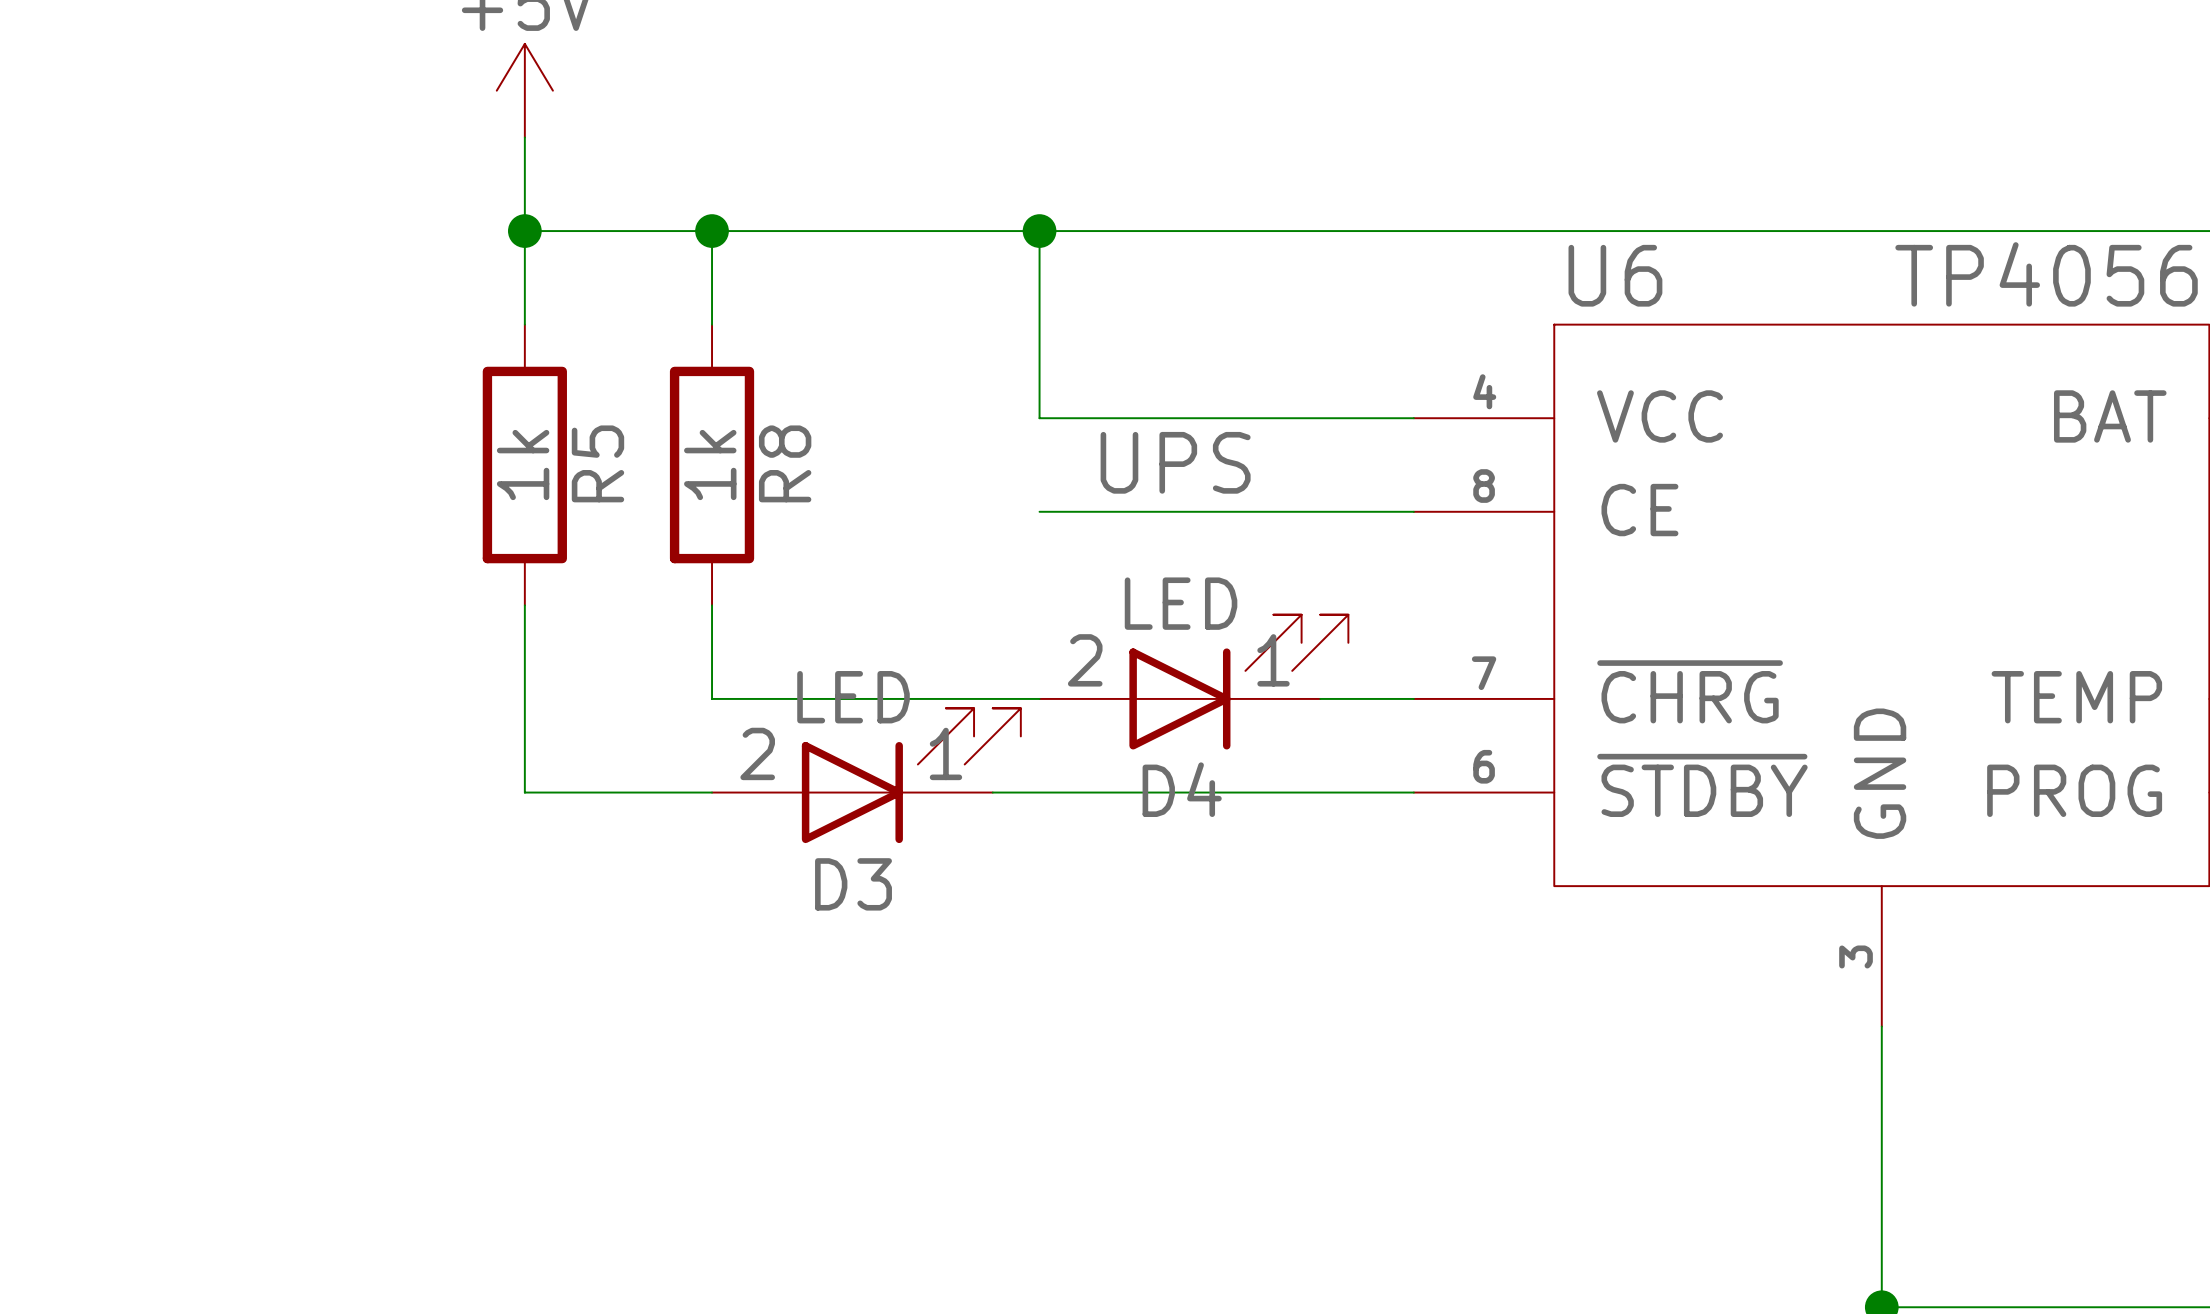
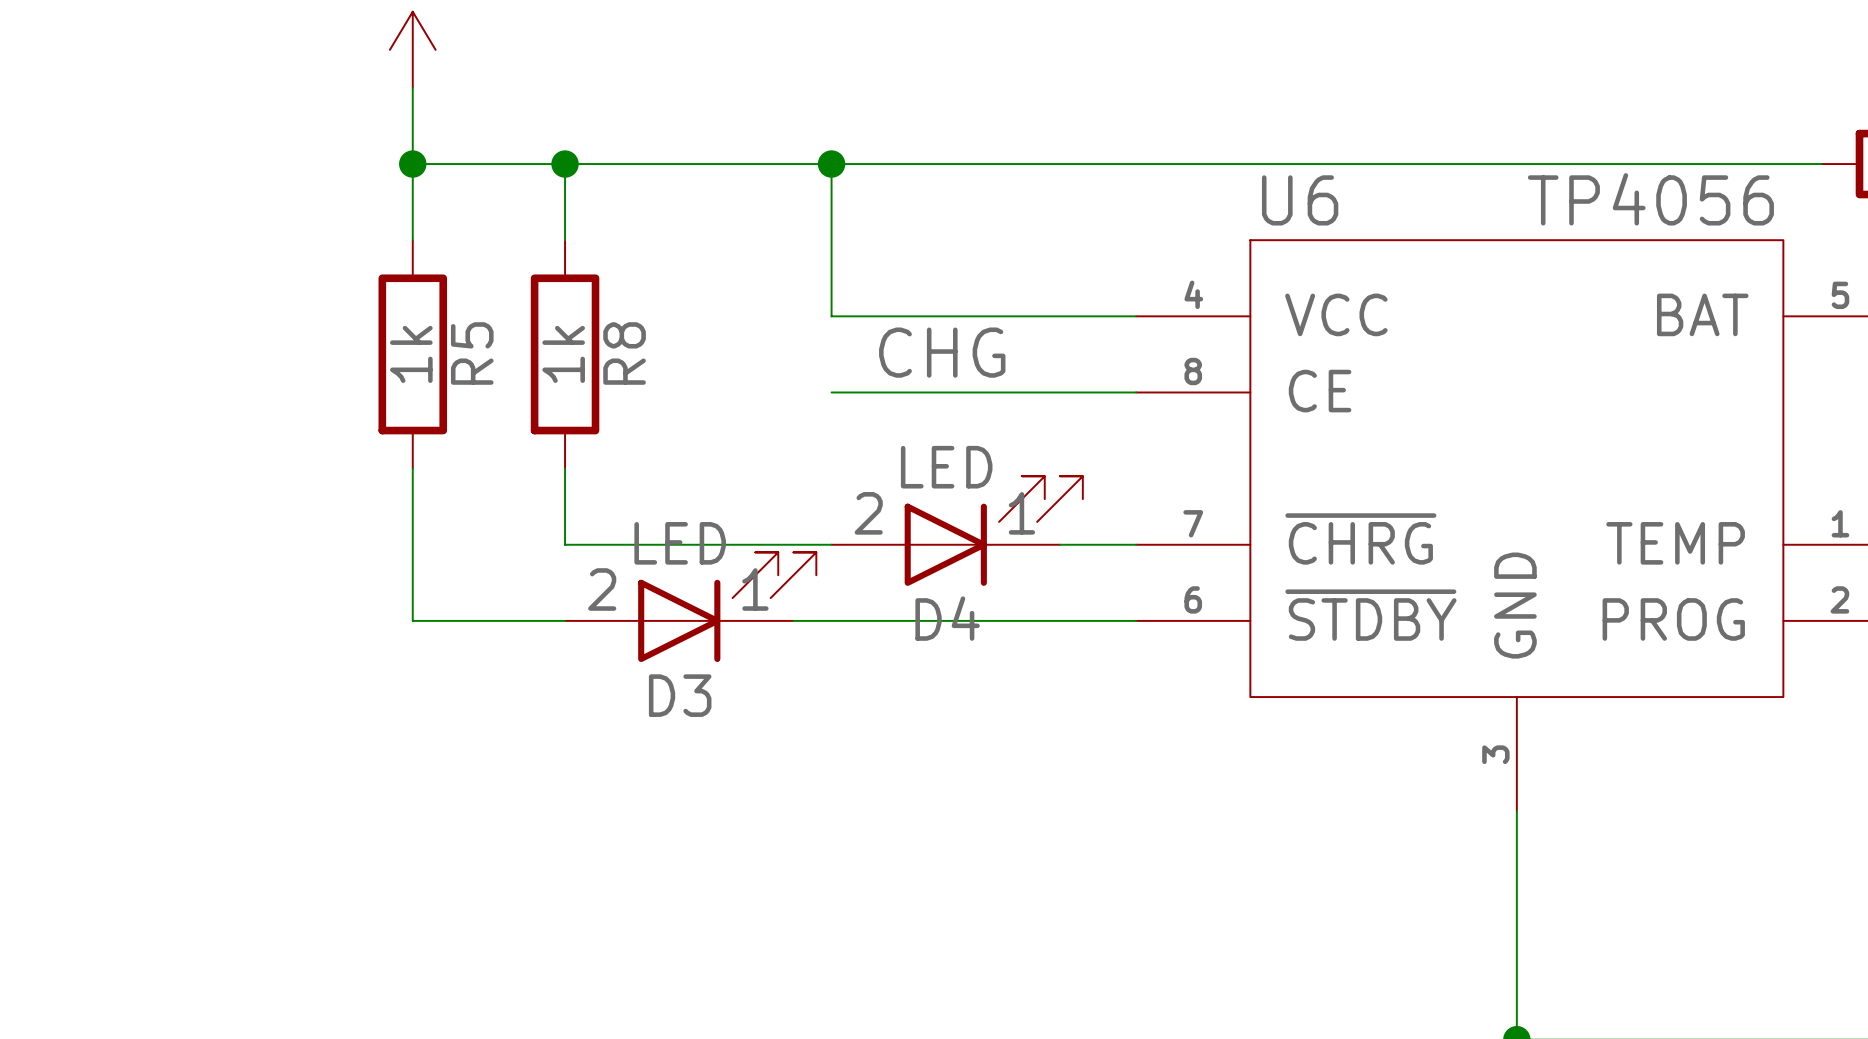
label: UPS (1175, 462) -> CHG (942, 352)

